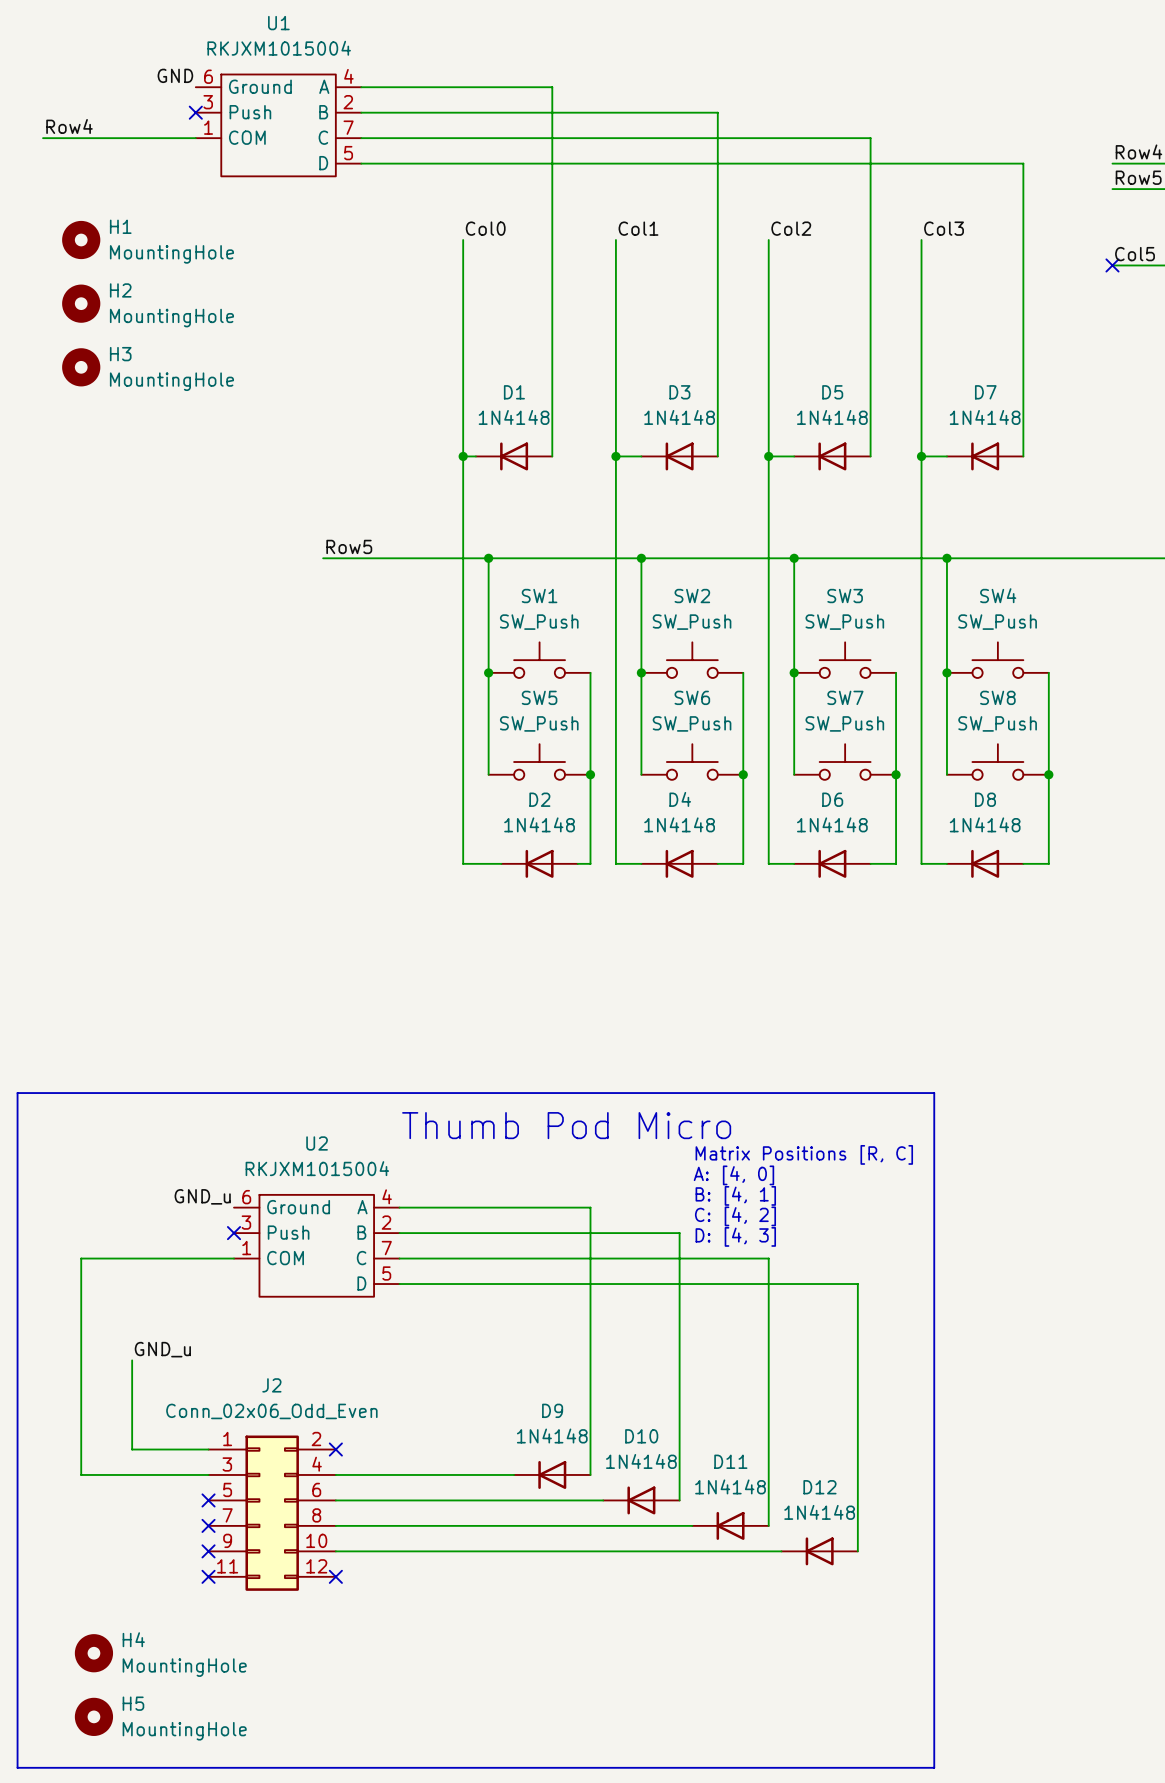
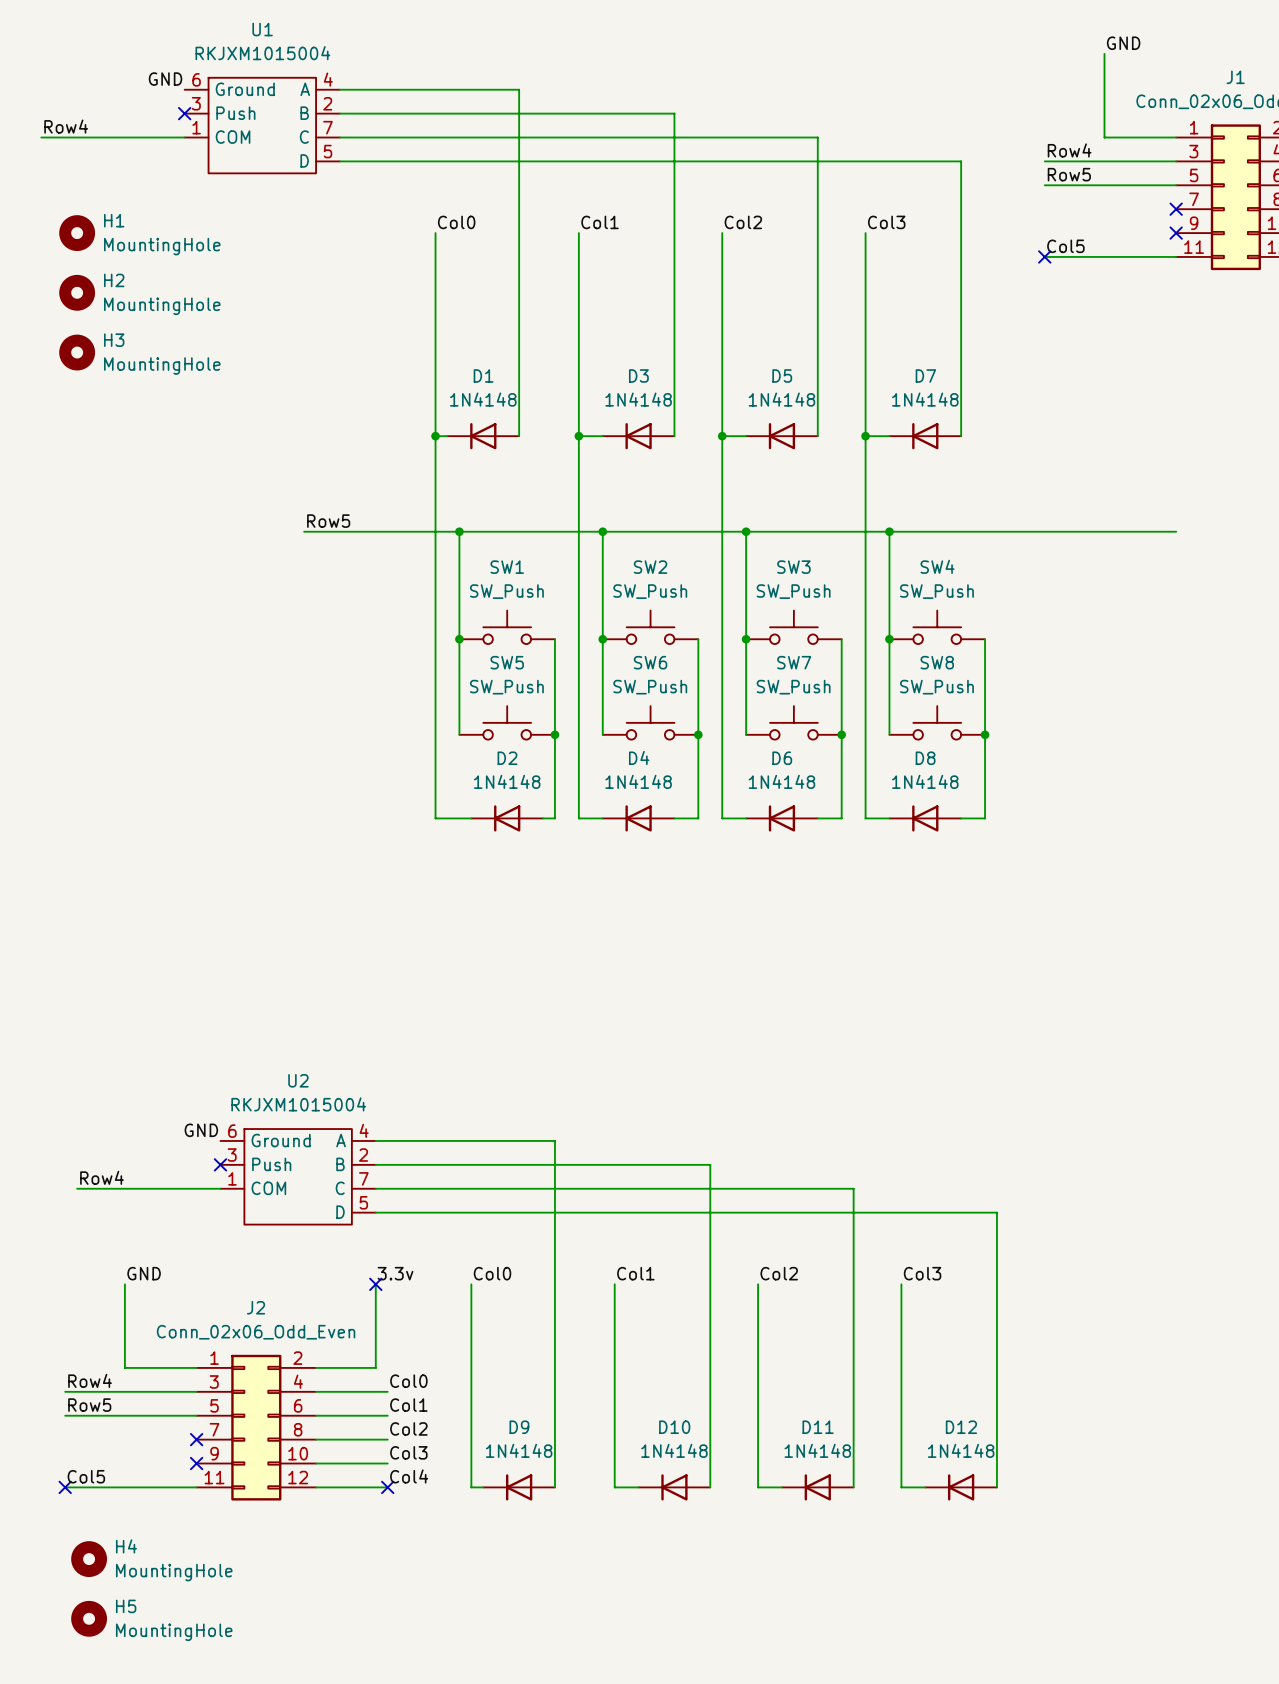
line: (17, 1093) (17, 1767) (934, 1767) (934, 1093) (17, 1093) -> none
text: Thumb Pod Micro (566, 1125) -> none
text: Matrix Positions [R, C] (804, 1154) -> none
text: A: [4, 0] (733, 1175) -> none
text: B: [4, 1] (735, 1195) -> none
label: GND_u (202, 1196) -> GND (201, 1130)
text: C: [4, 2] (735, 1216) -> none
wire: (679, 1233) (679, 1500) -> (638, 1164) (710, 1164) (710, 1487)
text: D: [4, 3] (735, 1236) -> none
label: none -> Row4 (101, 1177)
wire: (81, 1258) (81, 1474) -> (65, 1391) (77, 1391)
wire: (768, 1258) (768, 1525) -> (722, 1188) (853, 1188) (853, 1487)
wire: (857, 1284) (857, 1551) -> (805, 1212) (996, 1212) (996, 1487)
label: GND_u (162, 1349) -> GND (144, 1273)
label: none -> 3.3v (395, 1273)
label: none -> Col0 (492, 1273)
label: none -> Col1 (635, 1273)
label: none -> Col2 (779, 1273)
label: none -> Col3 (922, 1273)
wire: none -> (375, 1284) (375, 1367) (316, 1367)
no-connect mark: none -> (375, 1284)
wire: none -> (471, 1284) (471, 1487) (483, 1487)
wire: none -> (614, 1284) (614, 1487) (638, 1487)
wire: none -> (758, 1284) (758, 1487) (781, 1487)
wire: none -> (901, 1284) (901, 1487) (925, 1487)
no-connect mark: (335, 1449) -> none
label: none -> Row4 (90, 1380)
label: none -> Col0 (408, 1381)
wire: (412, 1474) (514, 1474) -> none
D9 position: (552, 1474) -> (519, 1487)
wire: none -> (554, 1391) (554, 1487)
label: none -> Row5 (89, 1405)
label: none -> Col1 (408, 1405)
wire: none -> (65, 1415) (196, 1415)
no-connect mark: (208, 1500) -> none
wire: (412, 1500) (603, 1500) -> none
D10 position: (641, 1500) -> (674, 1487)
label: none -> Col2 (408, 1428)
wire: (412, 1525) (692, 1525) -> none
D11 position: (730, 1525) -> (817, 1487)
label: none -> Col3 (408, 1452)
wire: (412, 1551) (781, 1551) -> none
D12 position: (819, 1551) -> (961, 1487)
label: none -> Col5 (86, 1476)
label: none -> Col4 (409, 1476)
wire: none -> (65, 1487) (196, 1487)
no-connect mark: none -> (65, 1487)
no-connect mark: (208, 1576) -> none
wire: none -> (316, 1487) (387, 1487)
no-connect mark: (335, 1576) -> none
no-connect mark: none -> (387, 1487)

